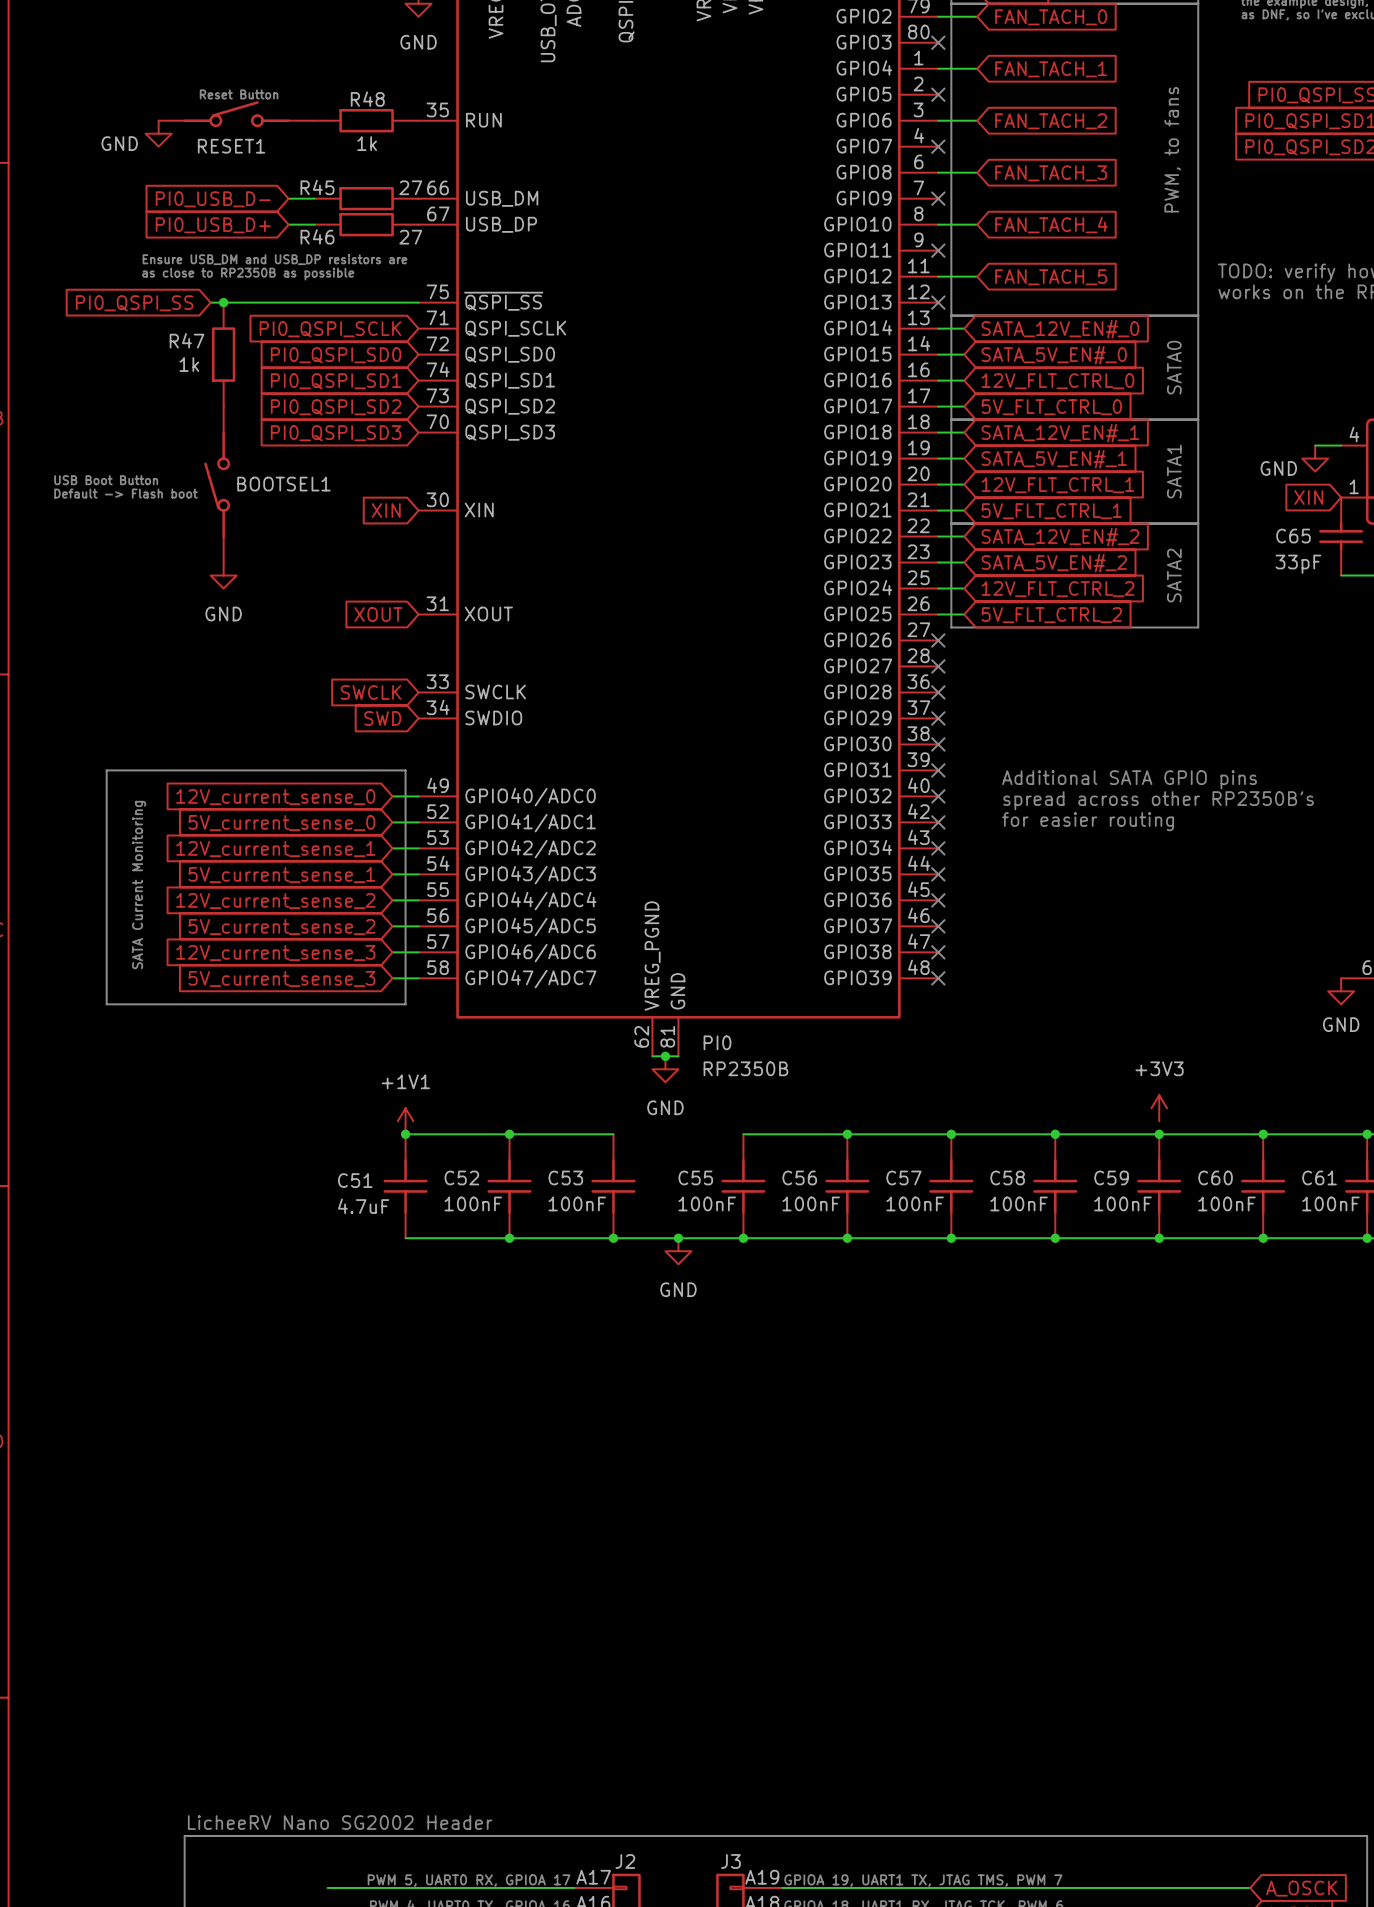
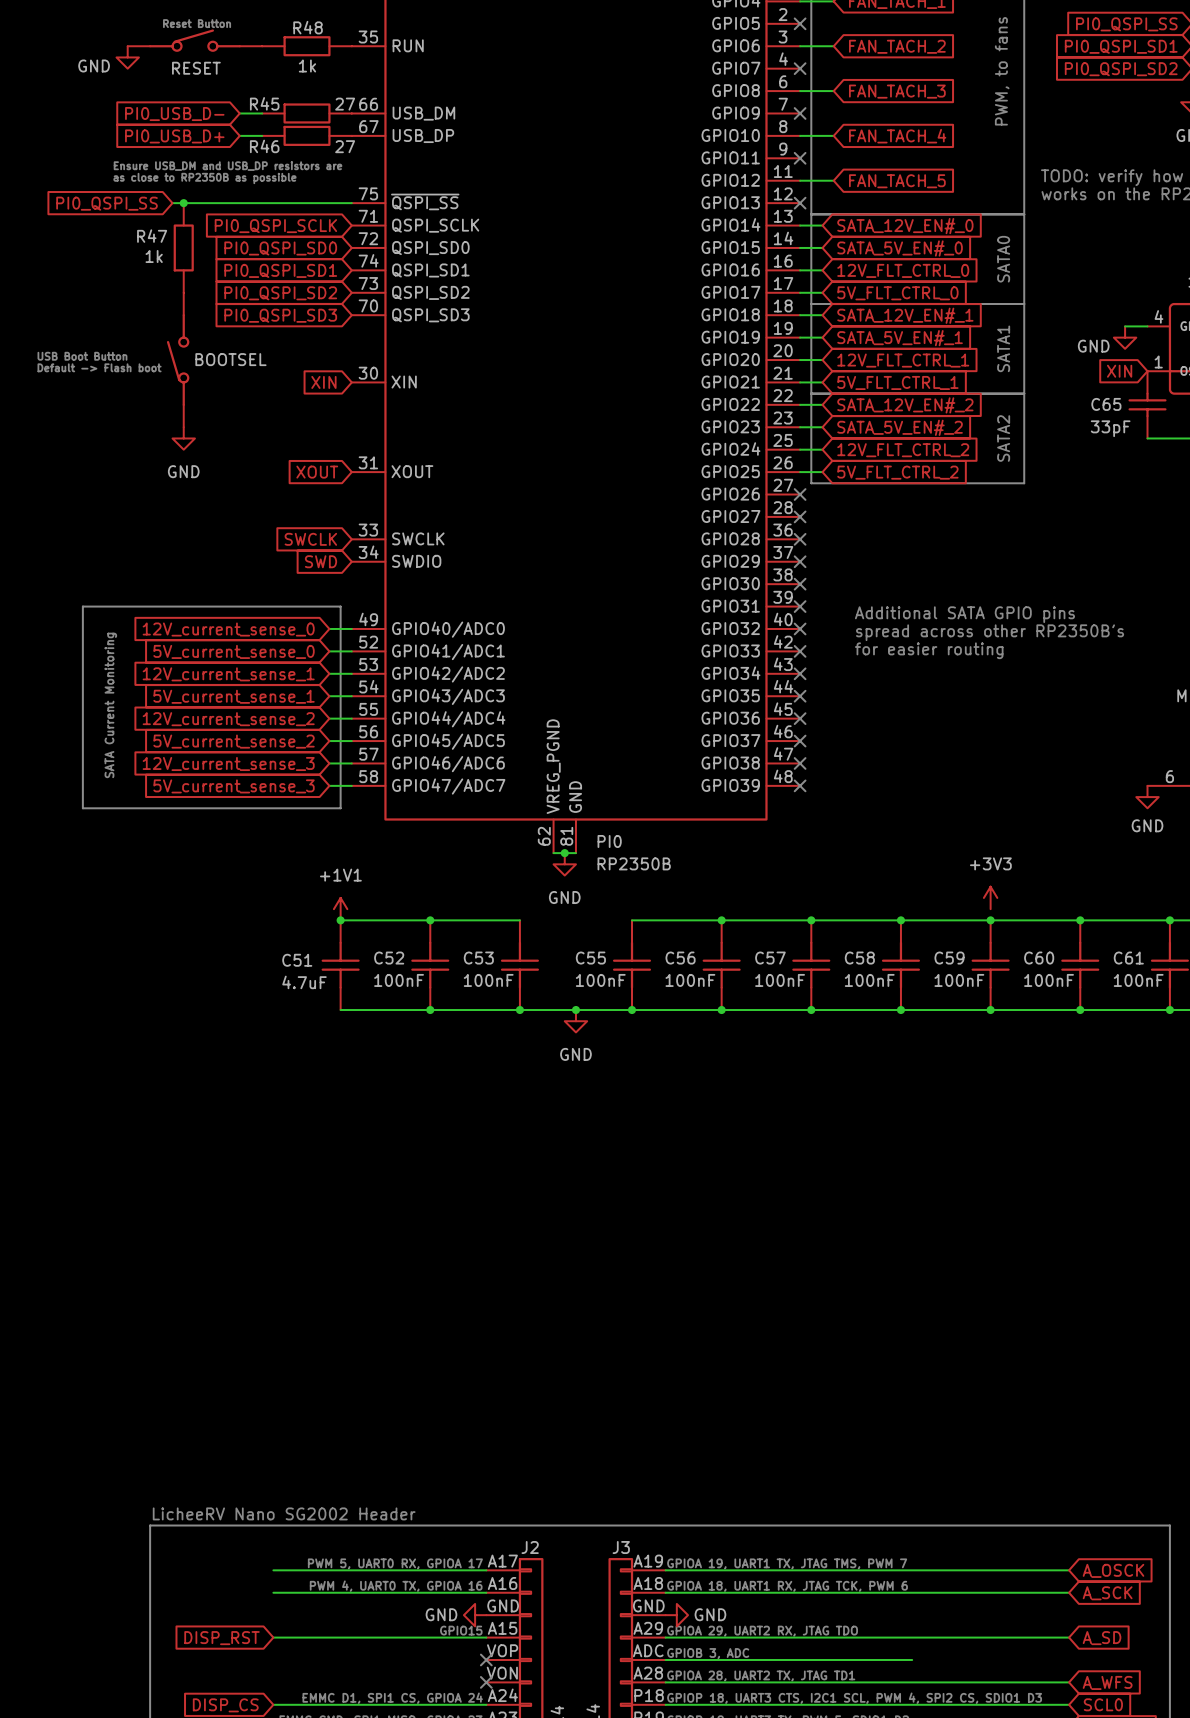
RESET1 name: RESET1 (231, 146) -> RESET (196, 68)
BOOTSEL1 name: BOOTSEL1 (283, 484) -> BOOTSEL (230, 359)

